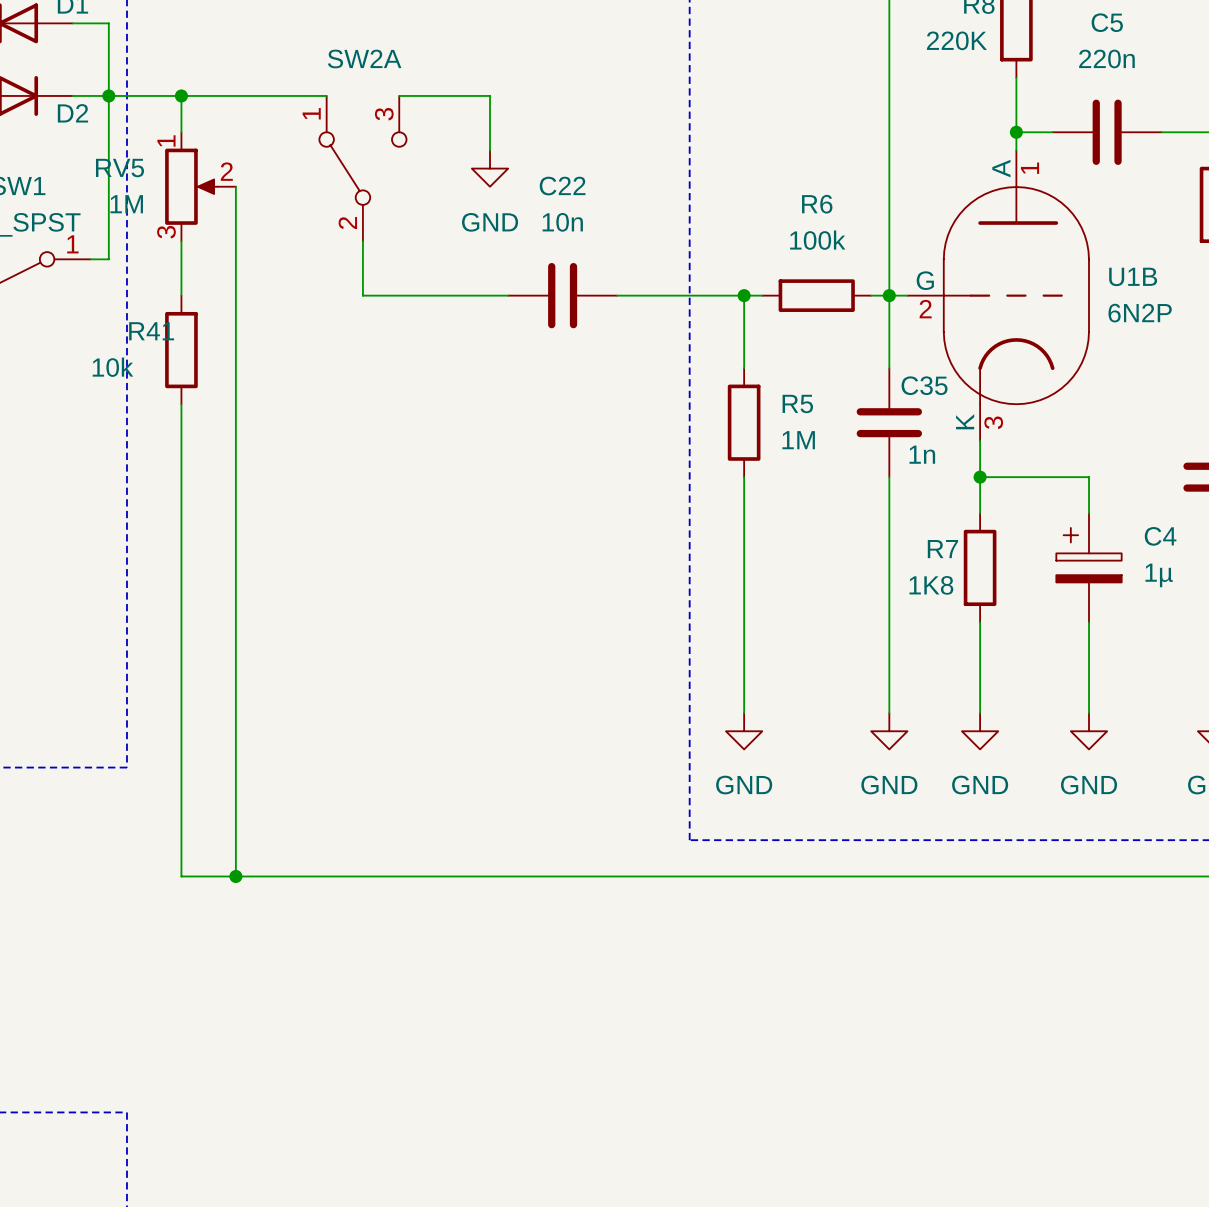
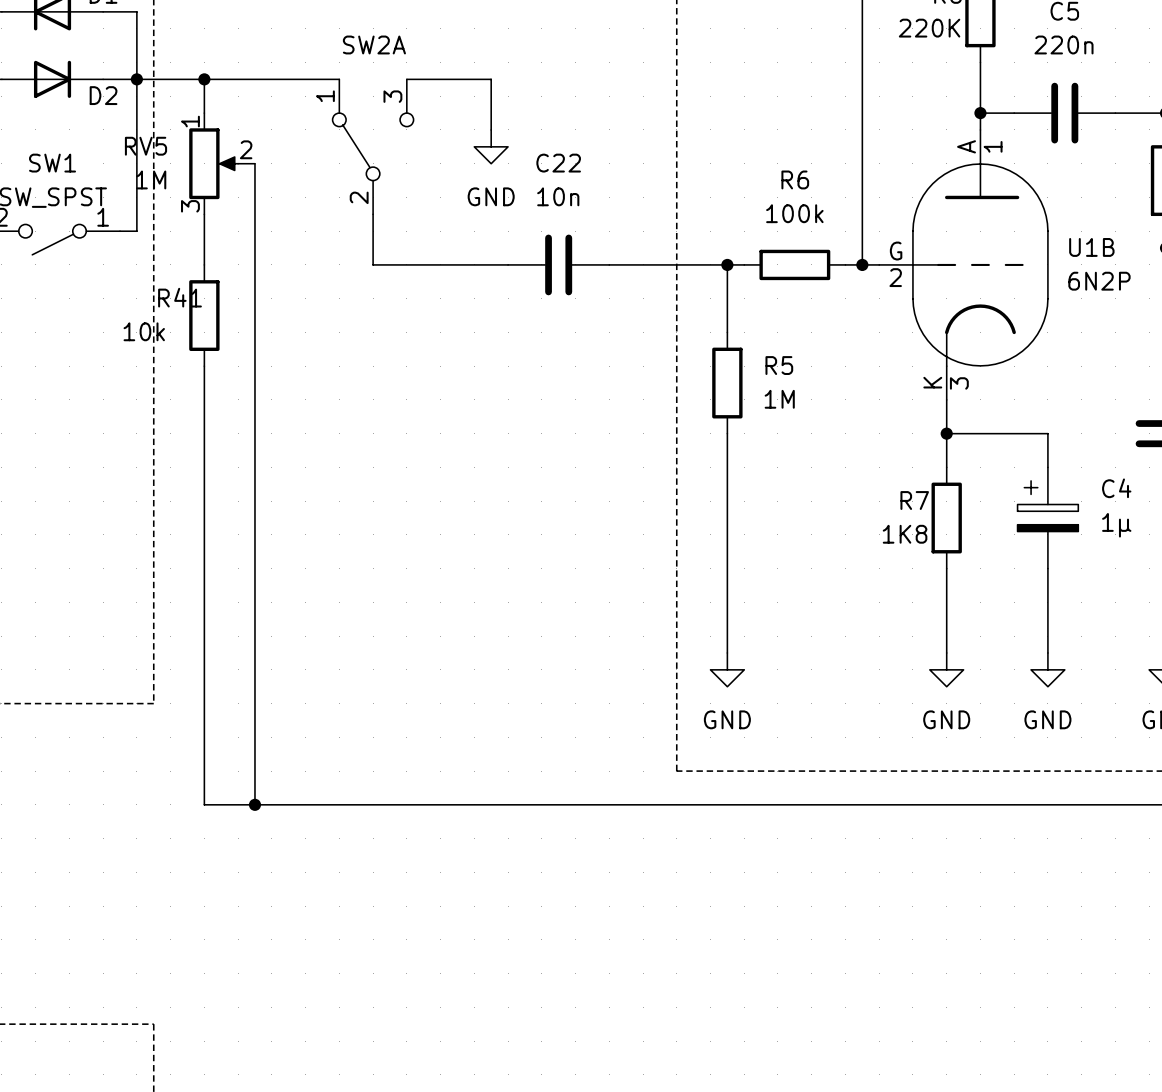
wire: (889, 295) (889, 368) -> none
C35: 1n (889, 422) -> none
wire: (889, 477) (889, 713) -> none
power symbol: GND (889, 731) -> none

